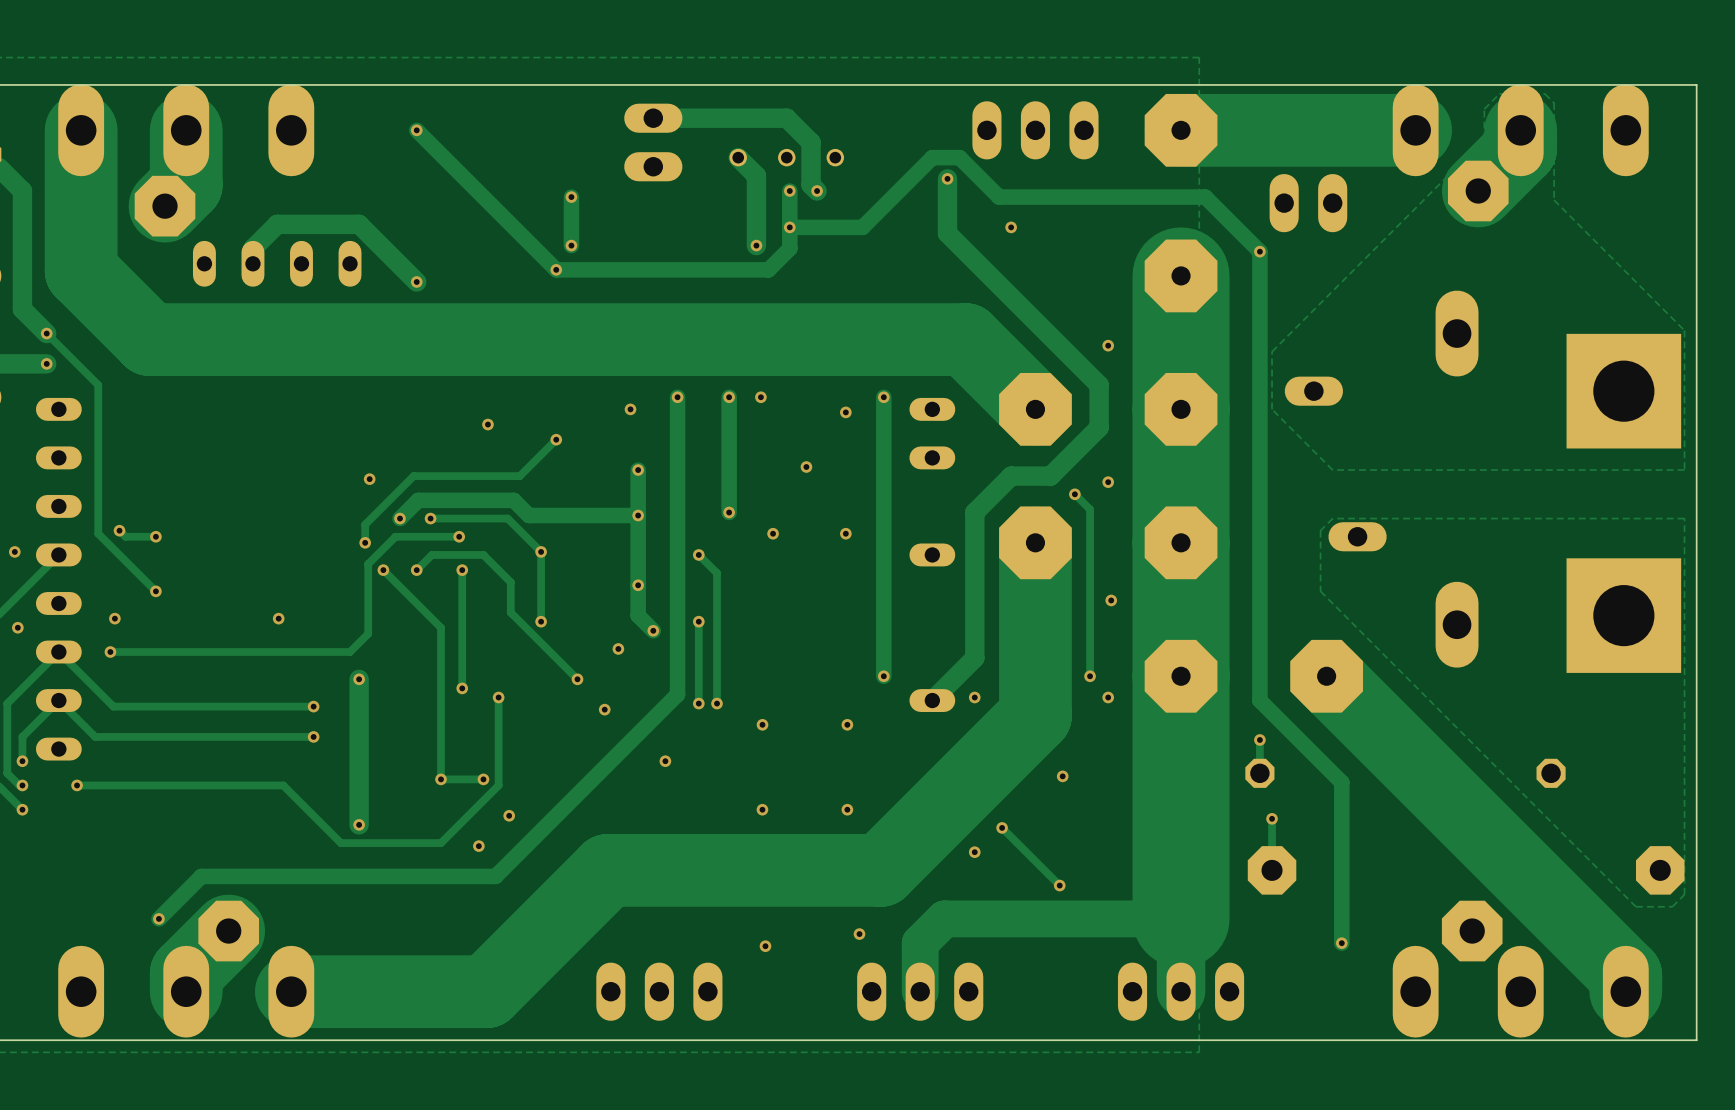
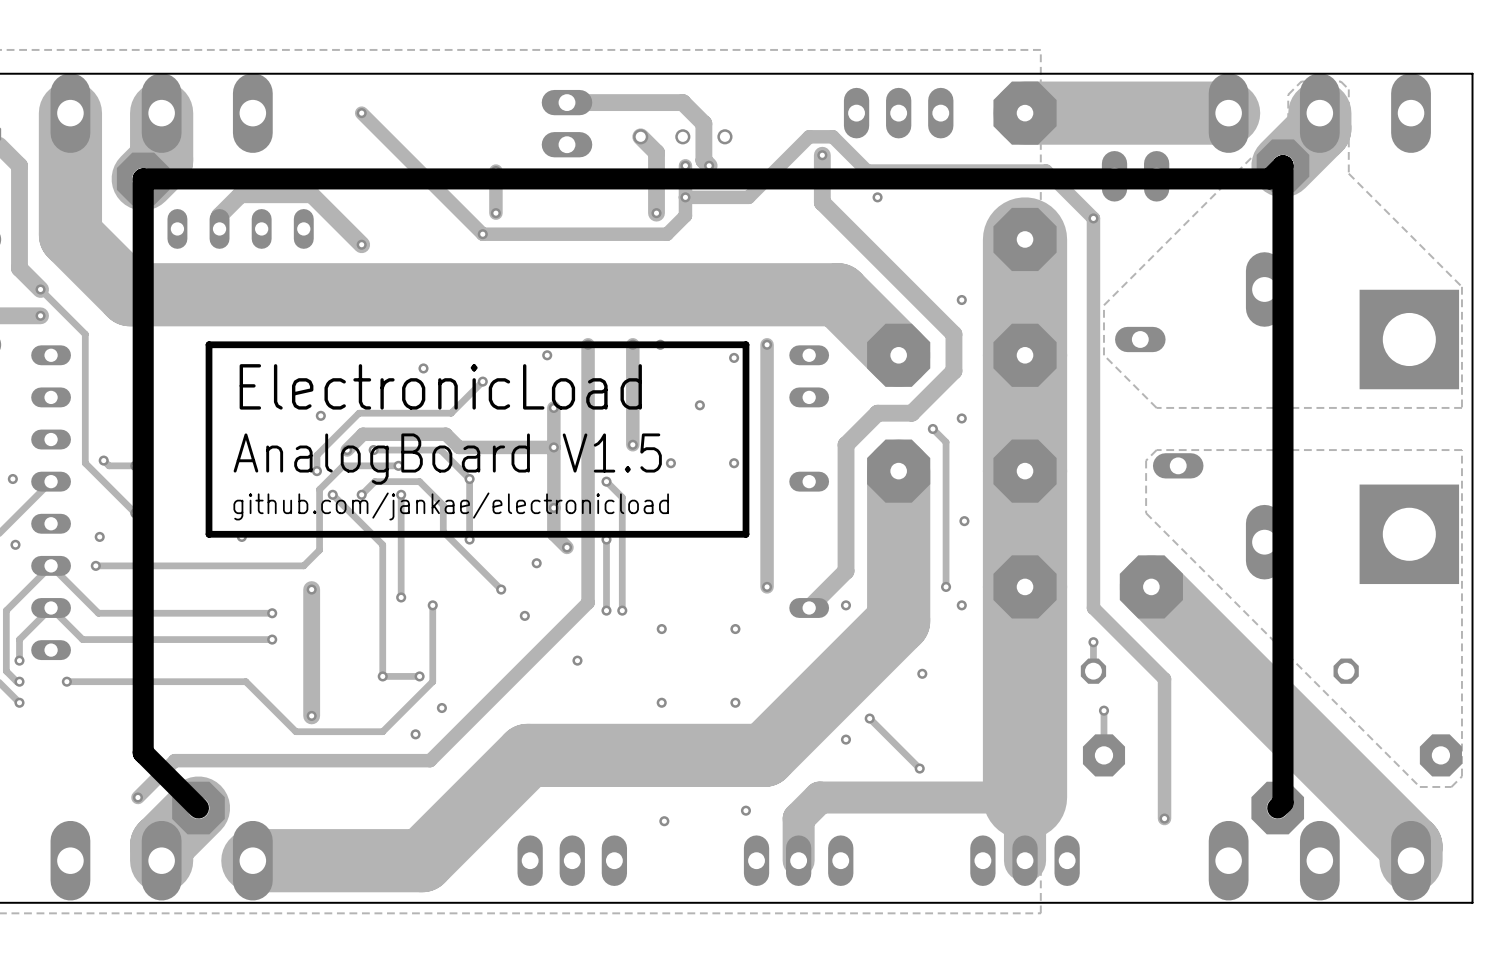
line: none -> (746, 344) (746, 534) (209, 534) (209, 344) (746, 344)
text: none -> ElectronicLoad (440, 386)
text: none -> AnalogBoard V1.5 (447, 459)
text: none -> github.com/jankae/electronicload (451, 506)
line: none -> (1277, 808) (1282, 802) (1282, 165) (1269, 178) (143, 178) (143, 752) (198, 808)

